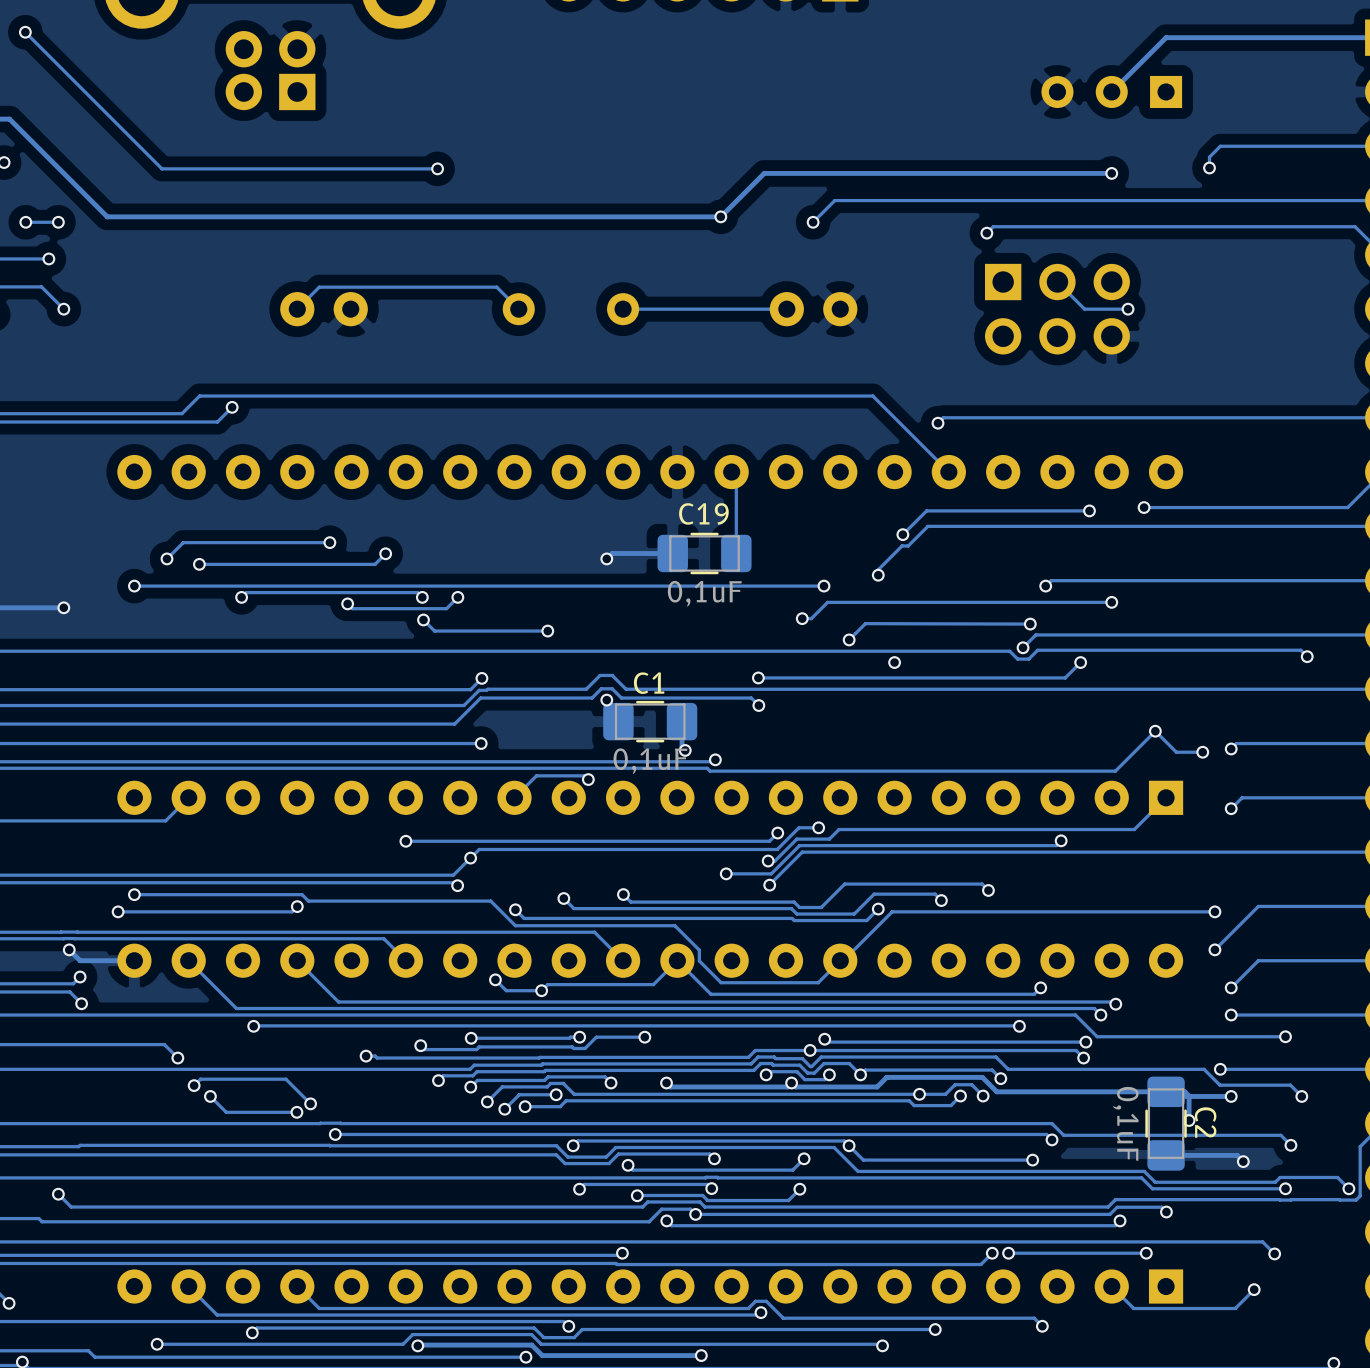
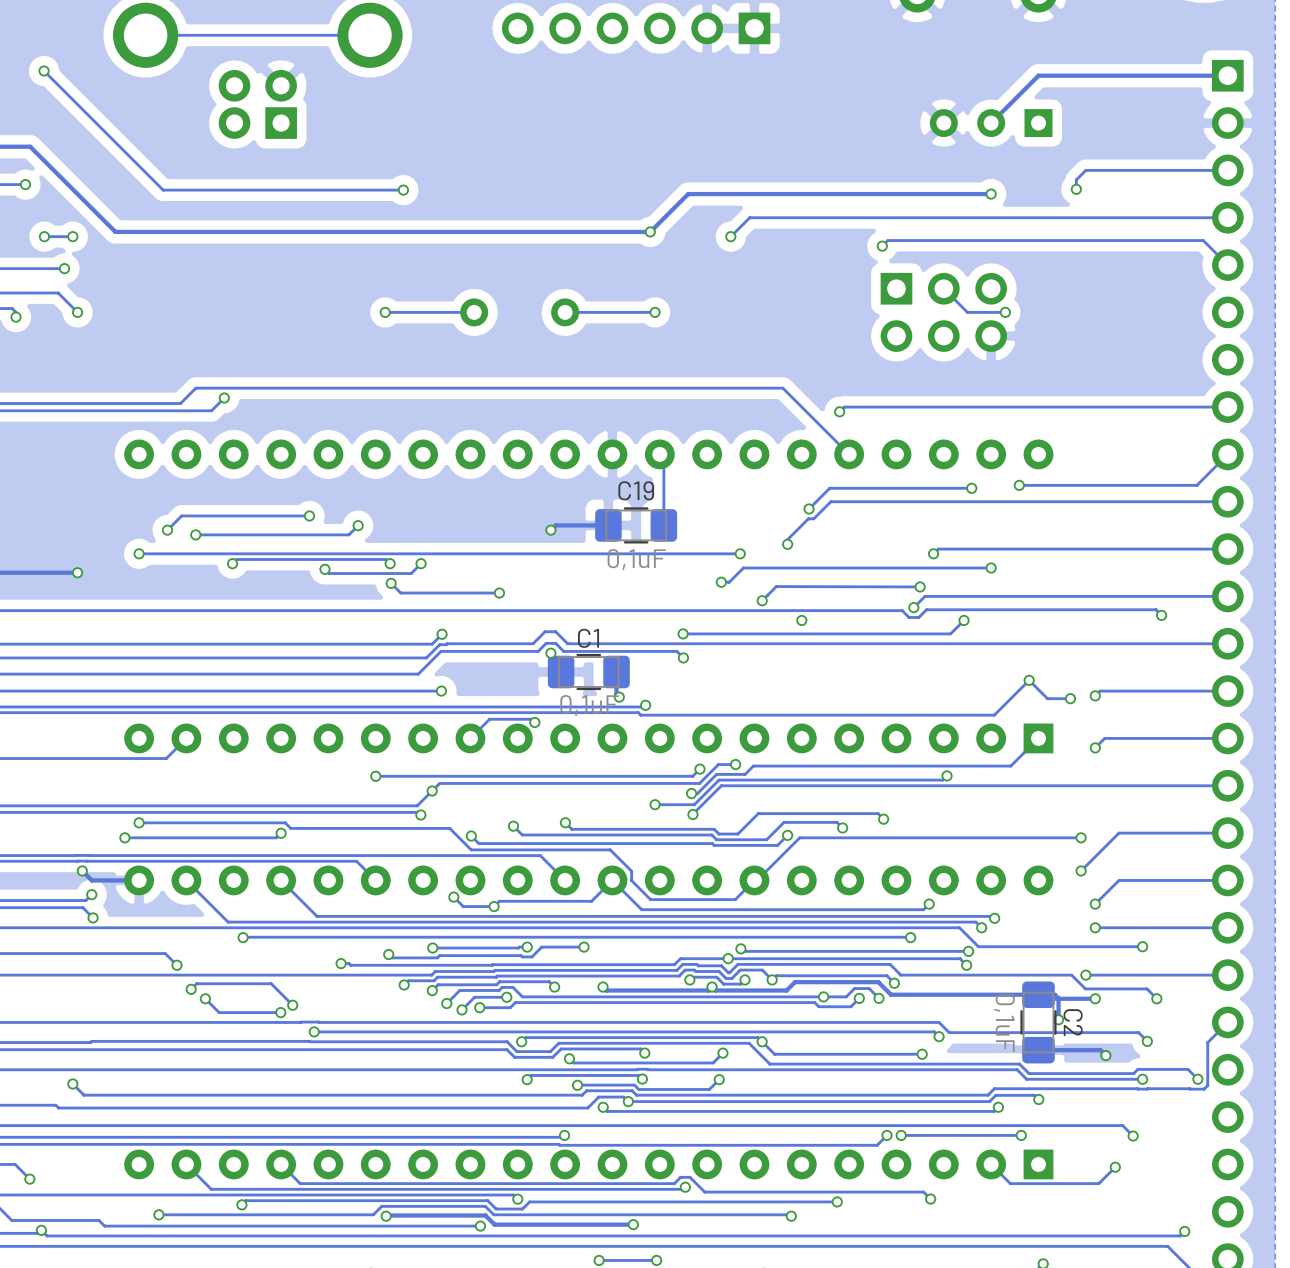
part: (324, 309) -> none
via: none -> (385, 312)
track: (518, 309) (496, 287) (319, 287) (297, 309) -> (474, 312) (385, 312)
via: none -> (655, 312)
track: (786, 309) (726, 309) -> none
part: (813, 309) -> none

